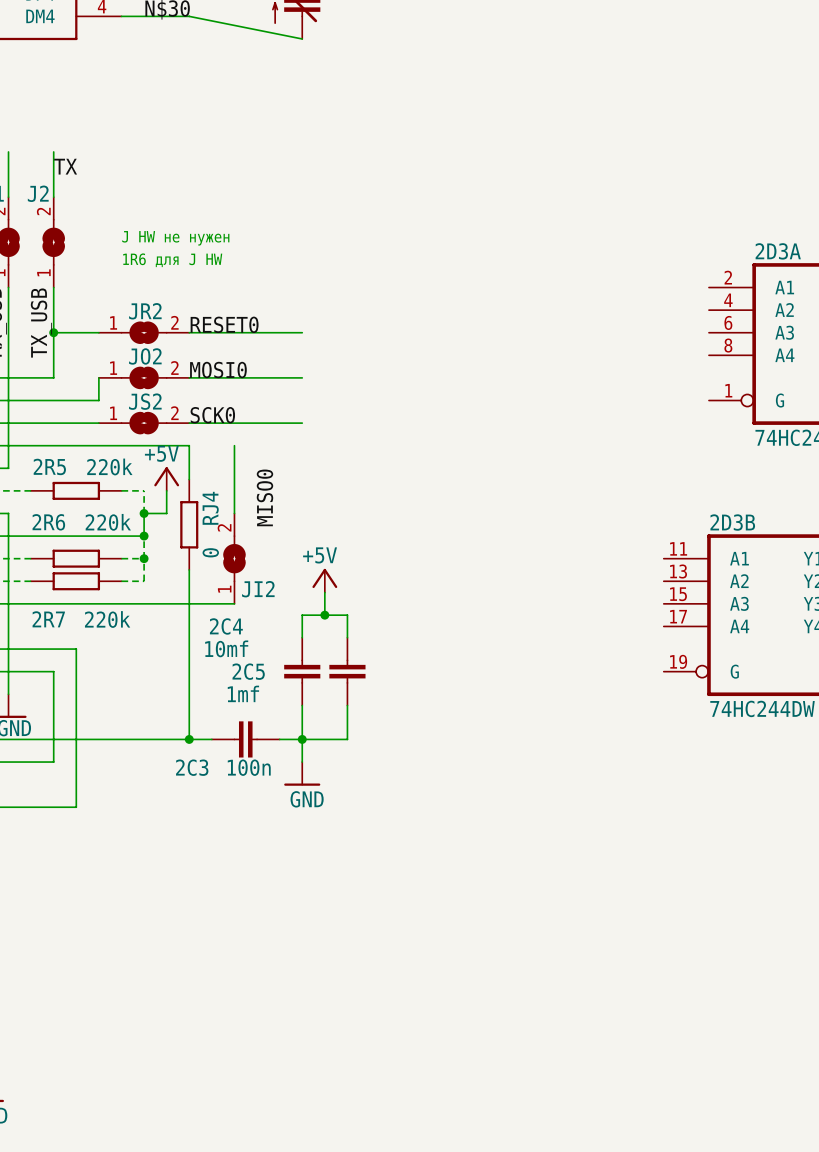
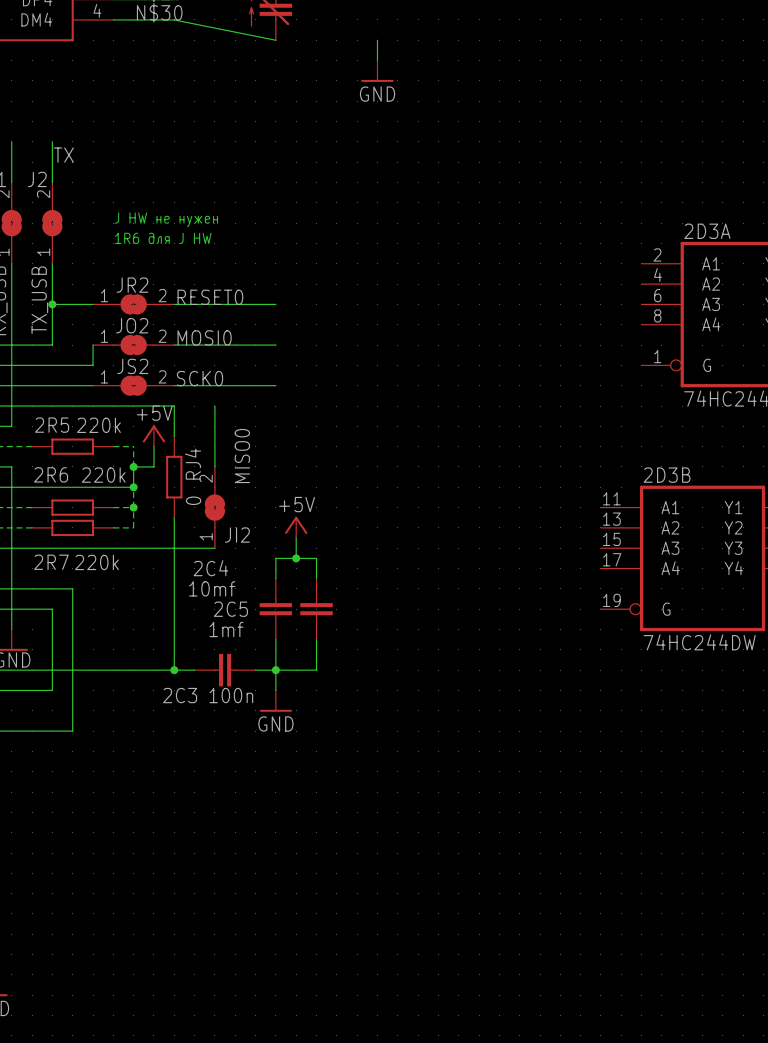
wire: none -> (377, 40) (377, 60)
power symbol: none -> GND (377, 71)

